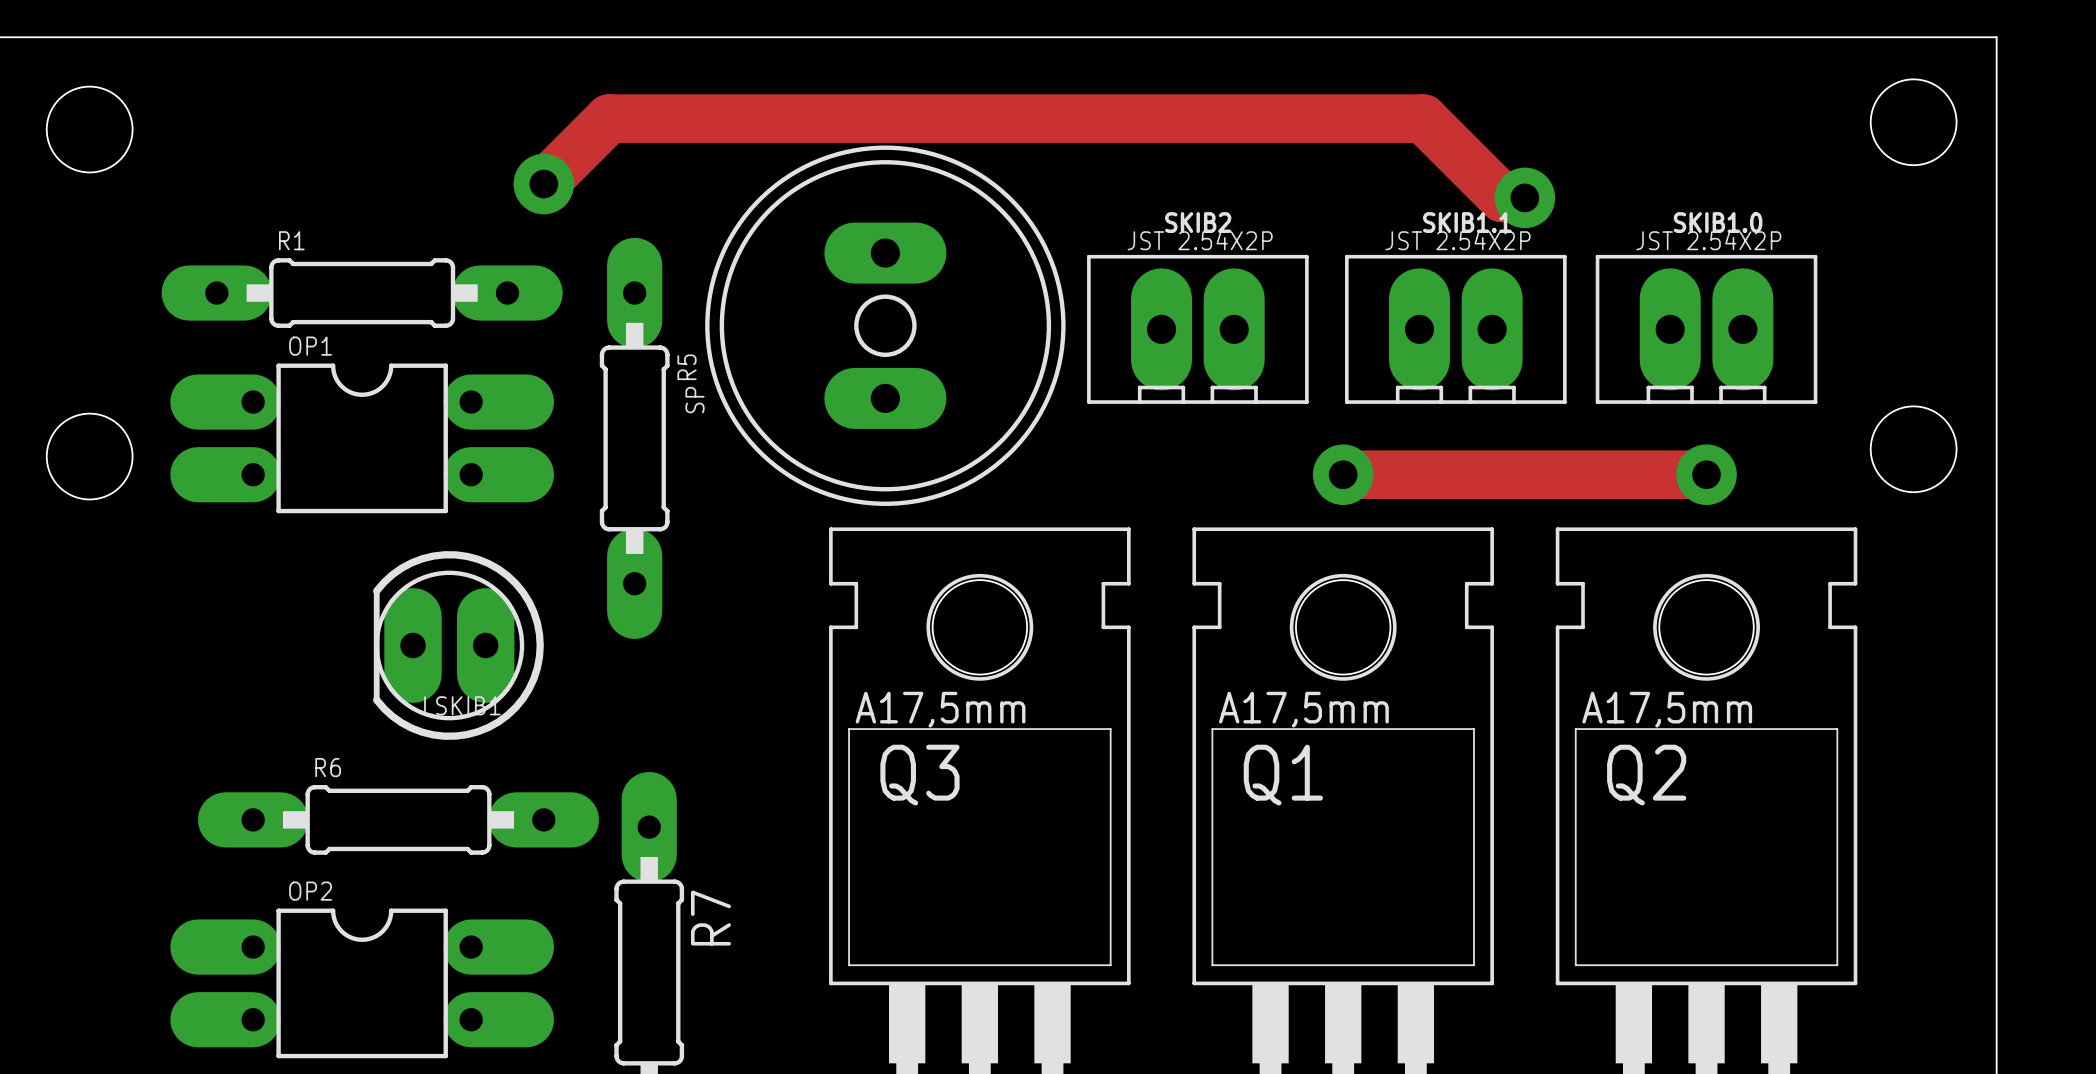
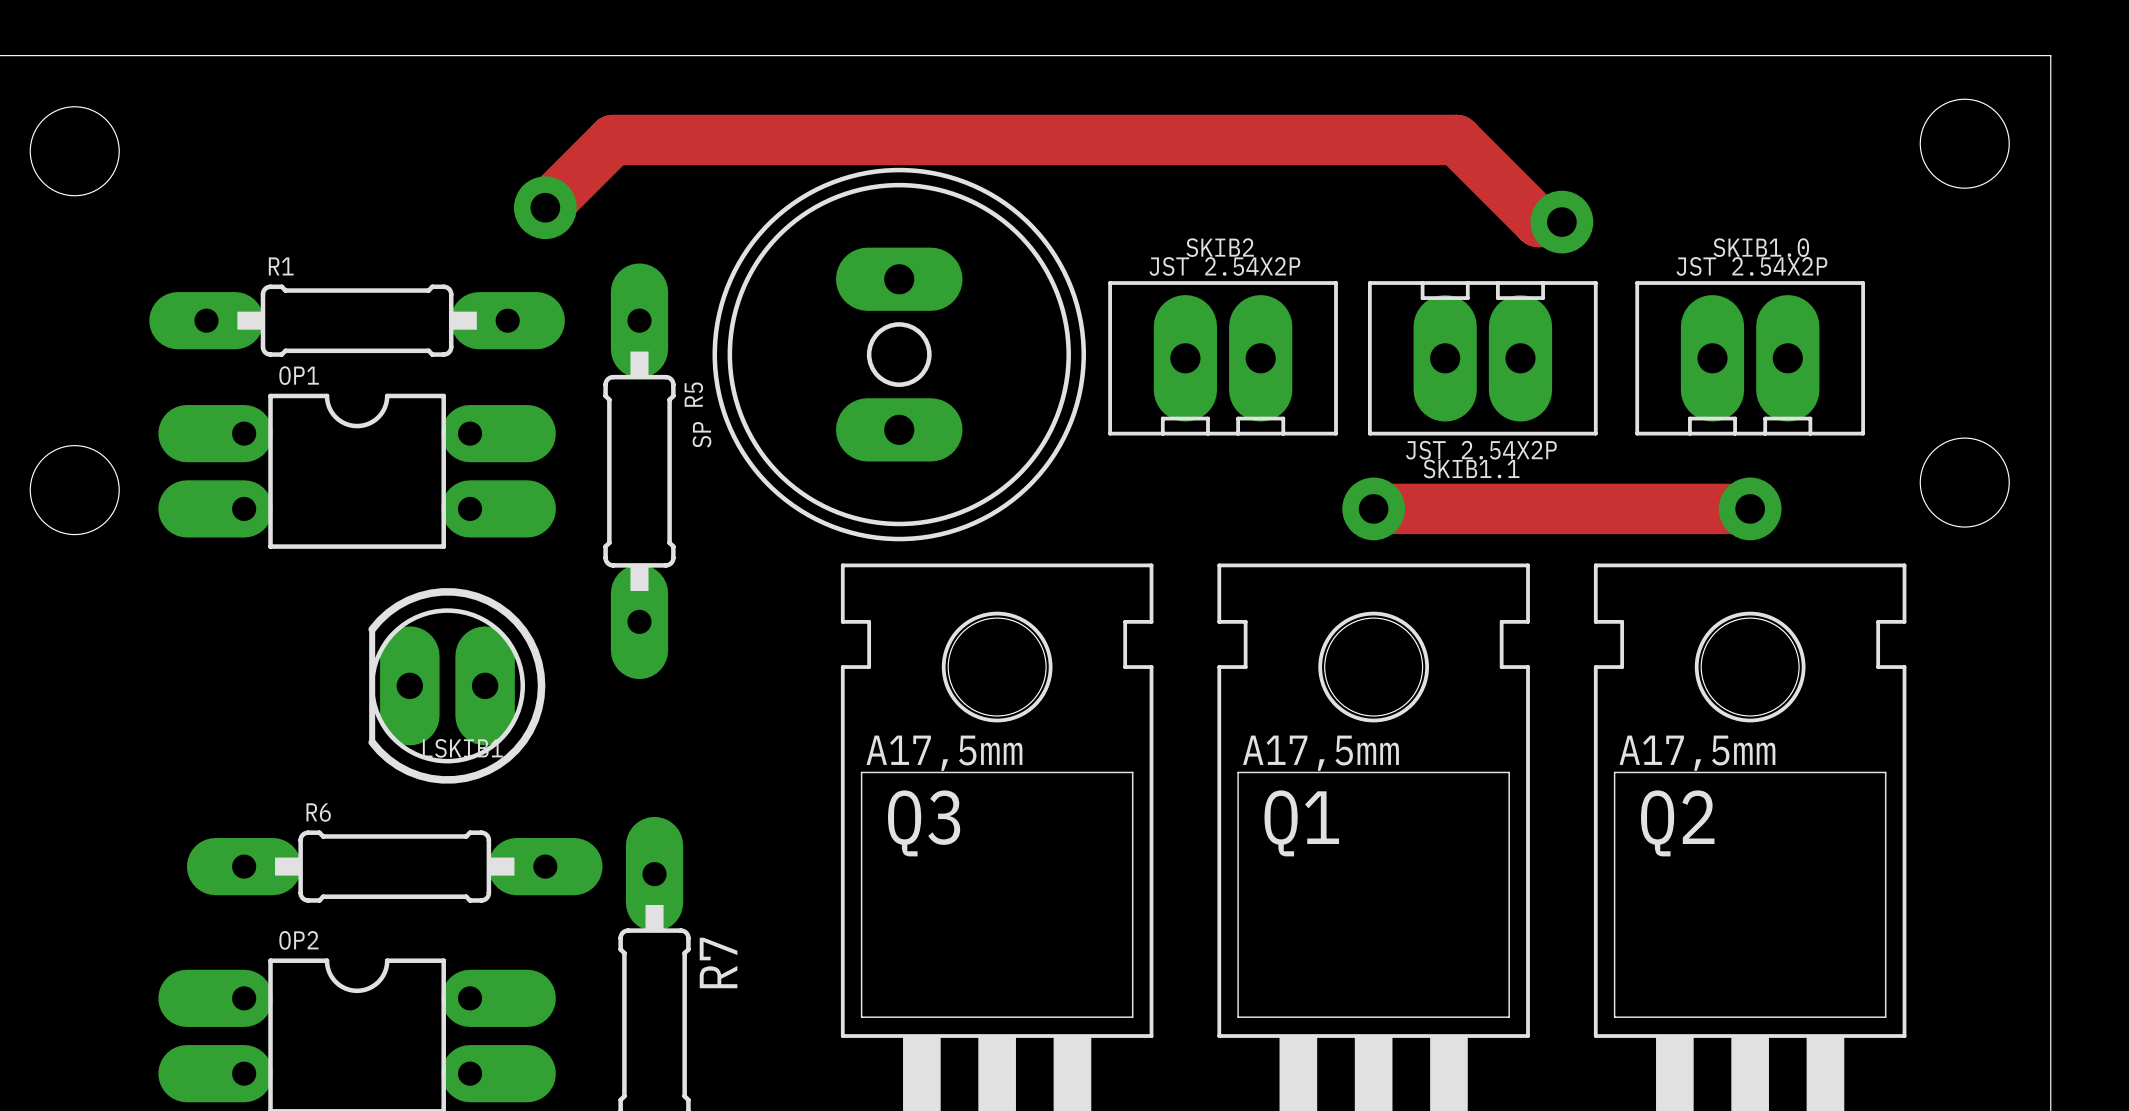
SKIB1.1 name position: SKIB1.1 (1467, 222) -> SKIB1.1 (1471, 469)
SKIB1.1 footprint: [1345, 254, 1567, 404] -> [1368, 281, 1598, 436]

